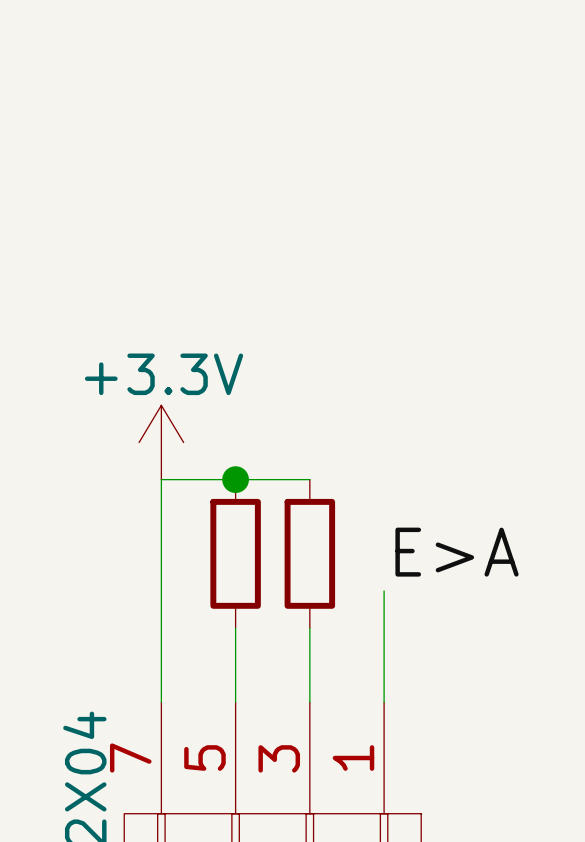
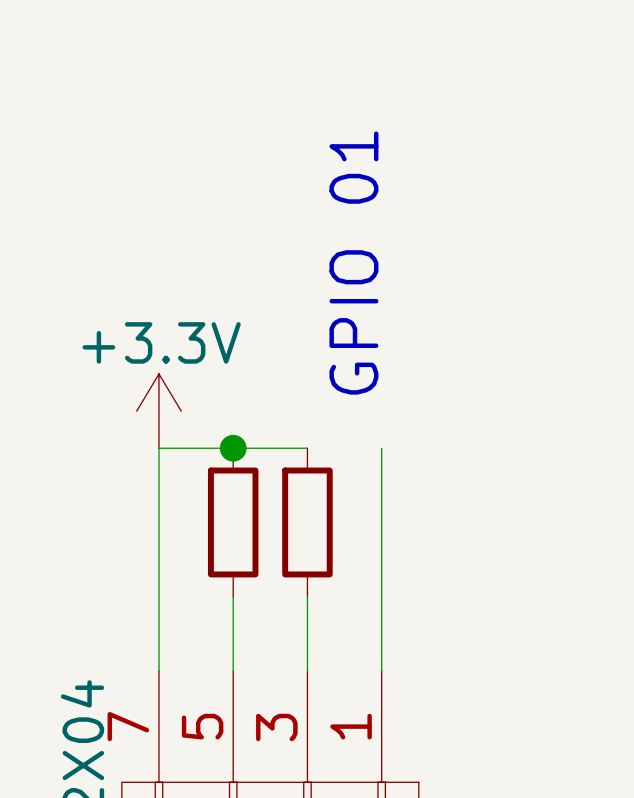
text: none -> GPIO 01 (353, 263)
wire: none -> (381, 448) (381, 559)
label: E>A (457, 552) -> none

